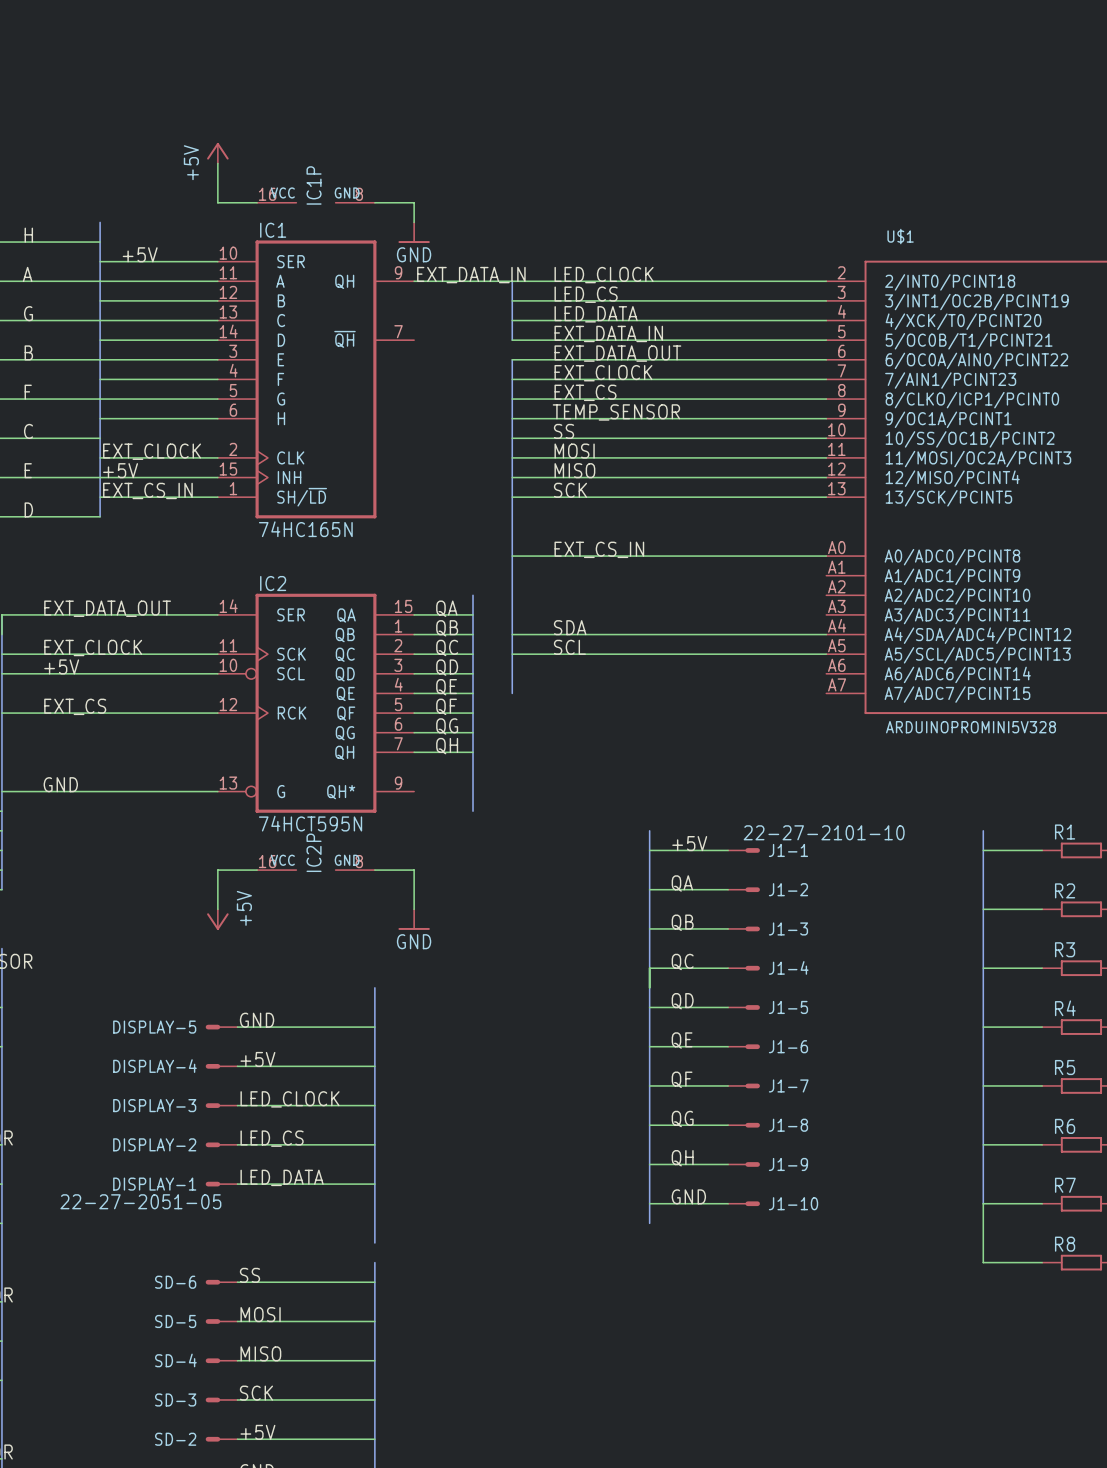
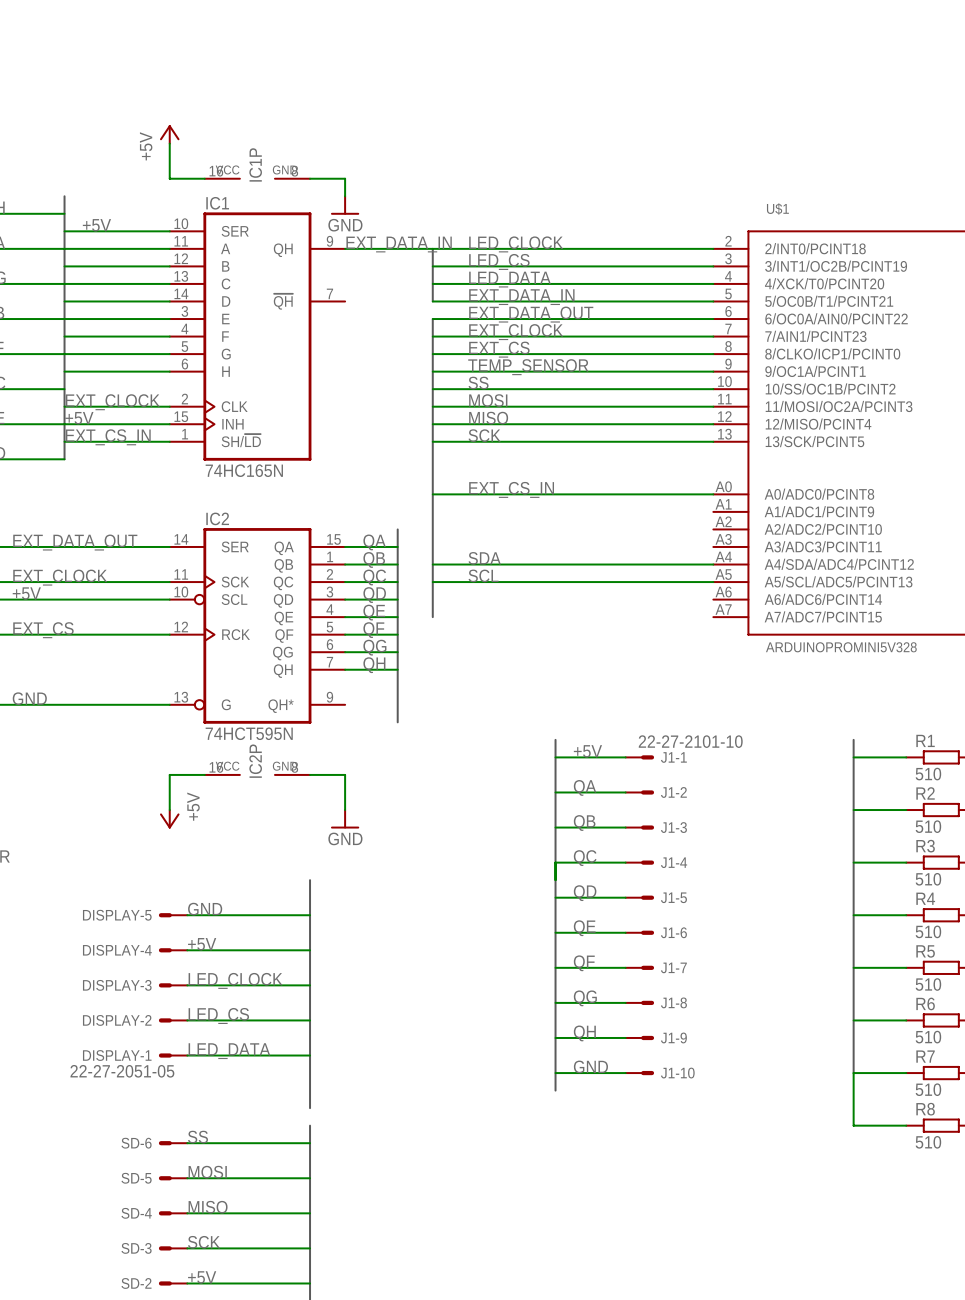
R1 value: none -> 510 (928, 774)
R2 value: none -> 510 (928, 826)
R3 value: none -> 510 (928, 879)
R4 value: none -> 510 (928, 931)
R5 value: none -> 510 (928, 984)
R6 value: none -> 510 (928, 1037)
R7 value: none -> 510 (928, 1089)
R8 value: none -> 510 (928, 1142)

